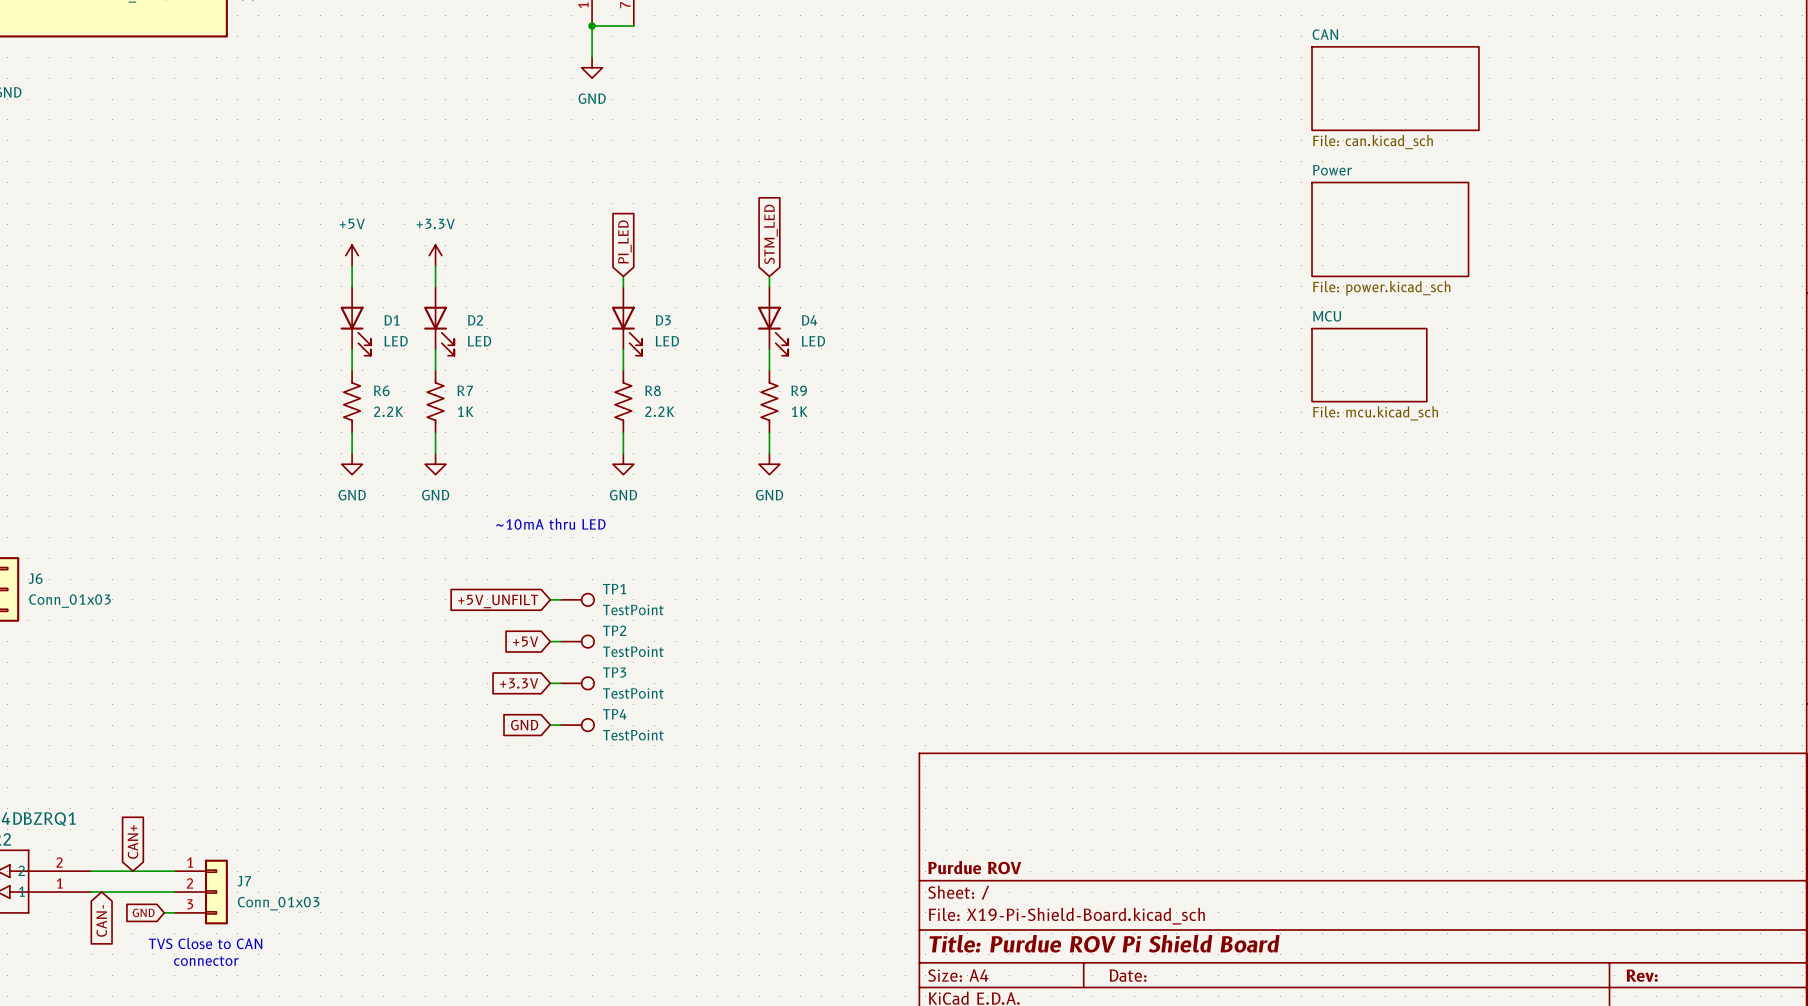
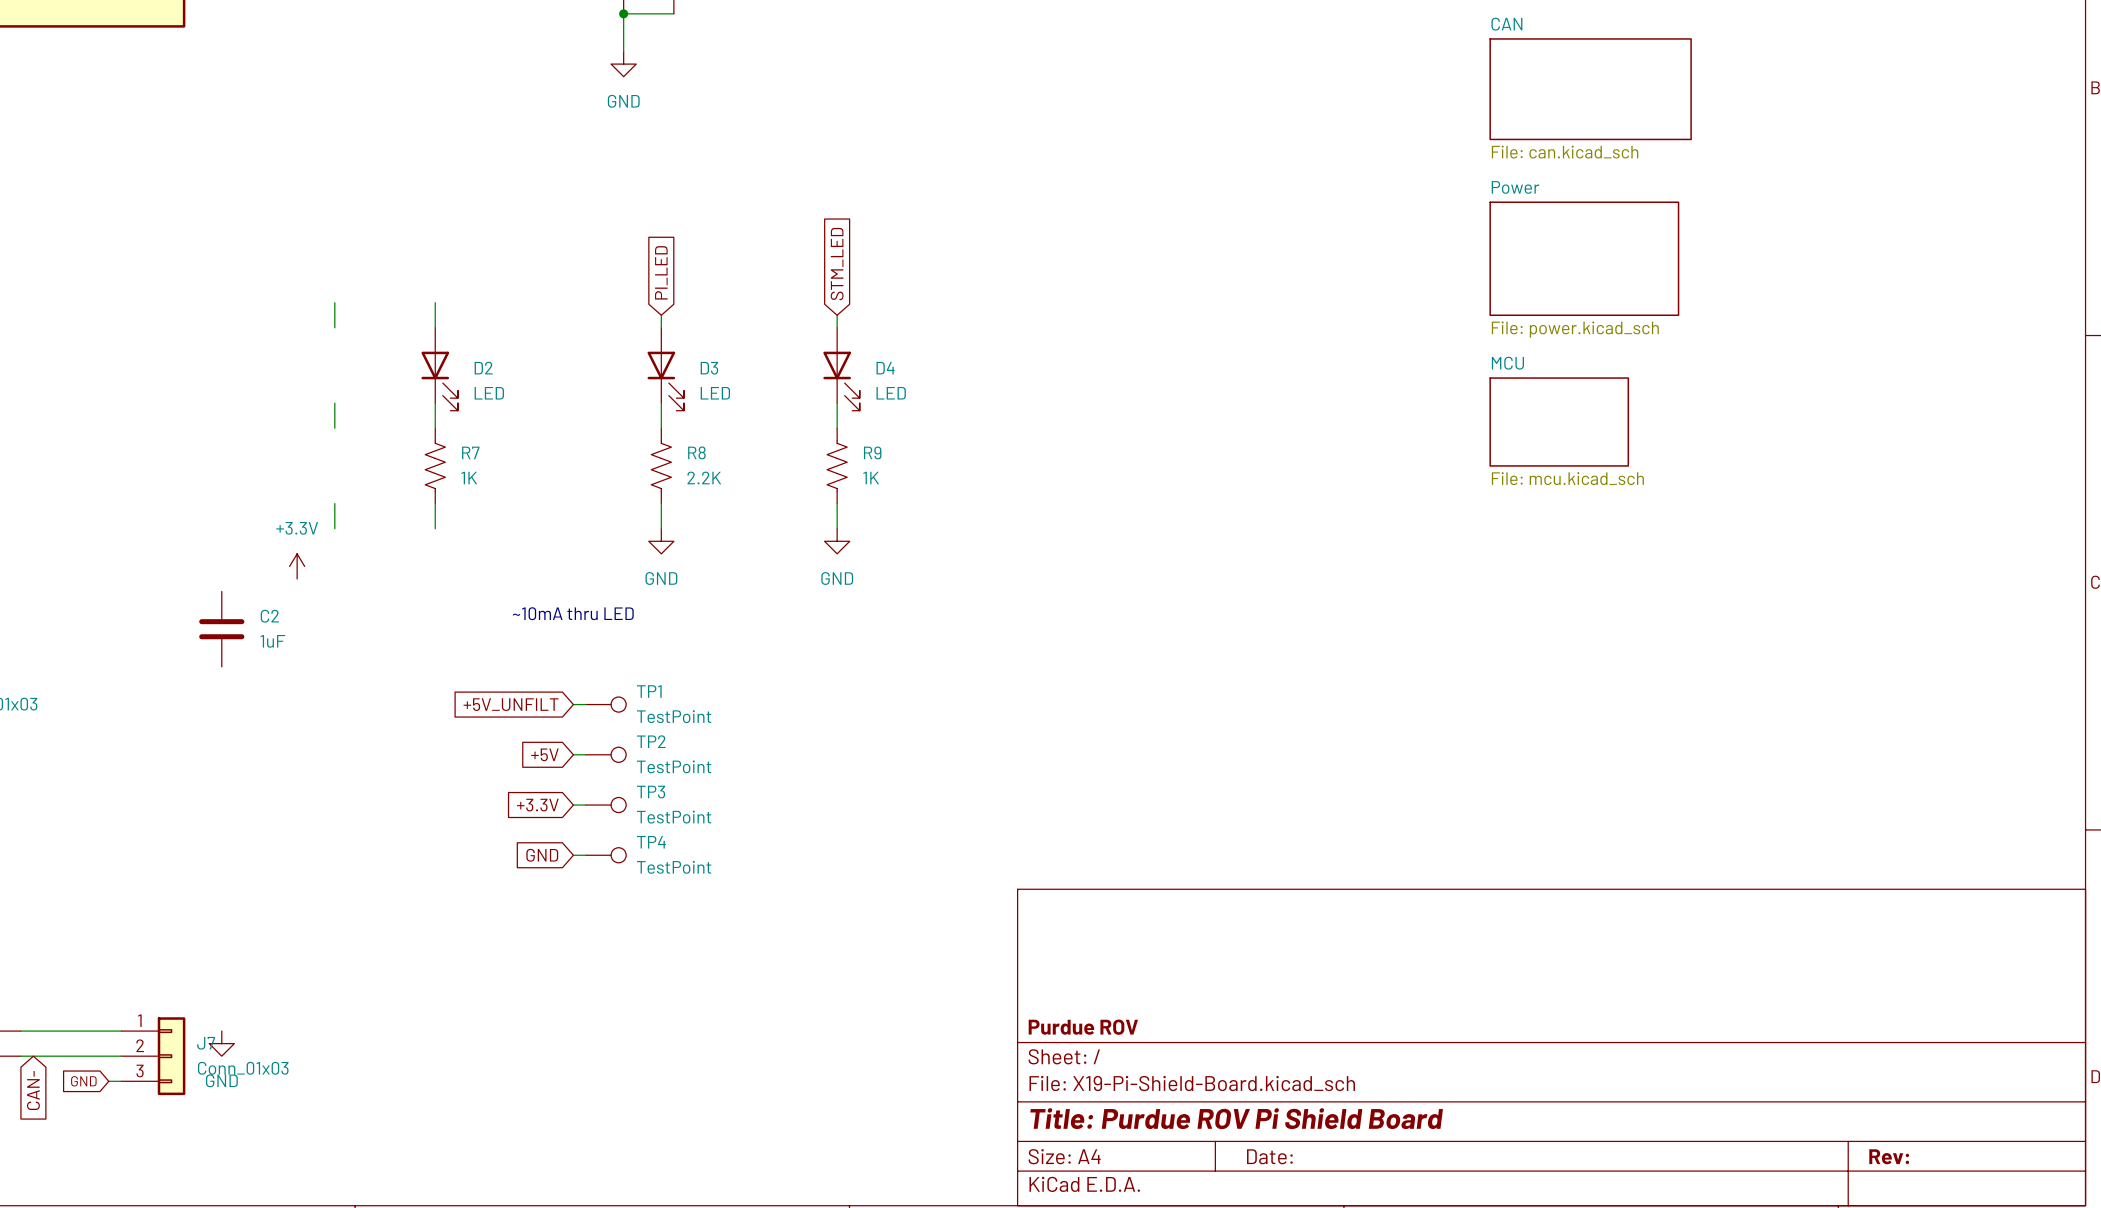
power symbol: +5V (352, 255) -> none
power symbol: +3.3V (435, 255) -> none
D1: LED (355, 321) -> none
R6: 2.2K (352, 401) -> none
power symbol: GND (352, 464) -> none
power symbol: GND (435, 464) -> none
power symbol: none -> +3.3V (297, 566)
C2: none -> 1uF (221, 629)
global label: CAN+ (133, 841) -> none
power symbol: none -> GND (221, 1043)
text: TVS Close to CAN (205, 943) -> none
text: connector (206, 960) -> none

